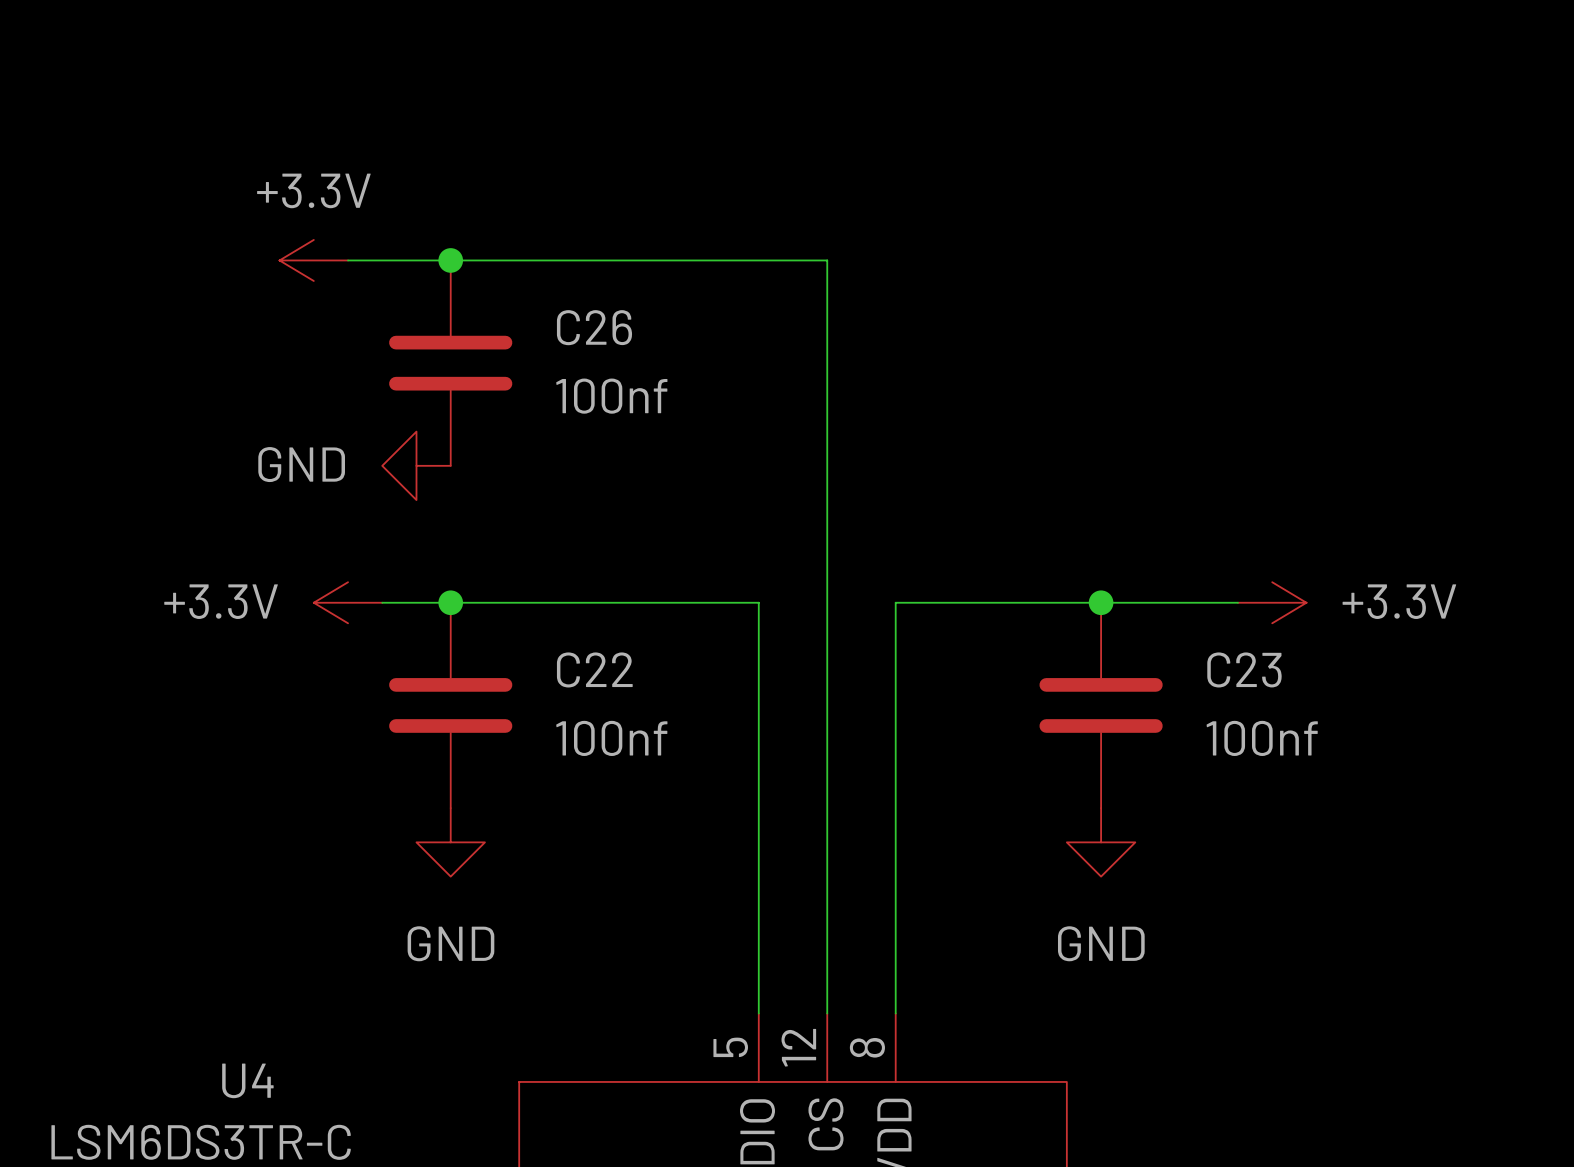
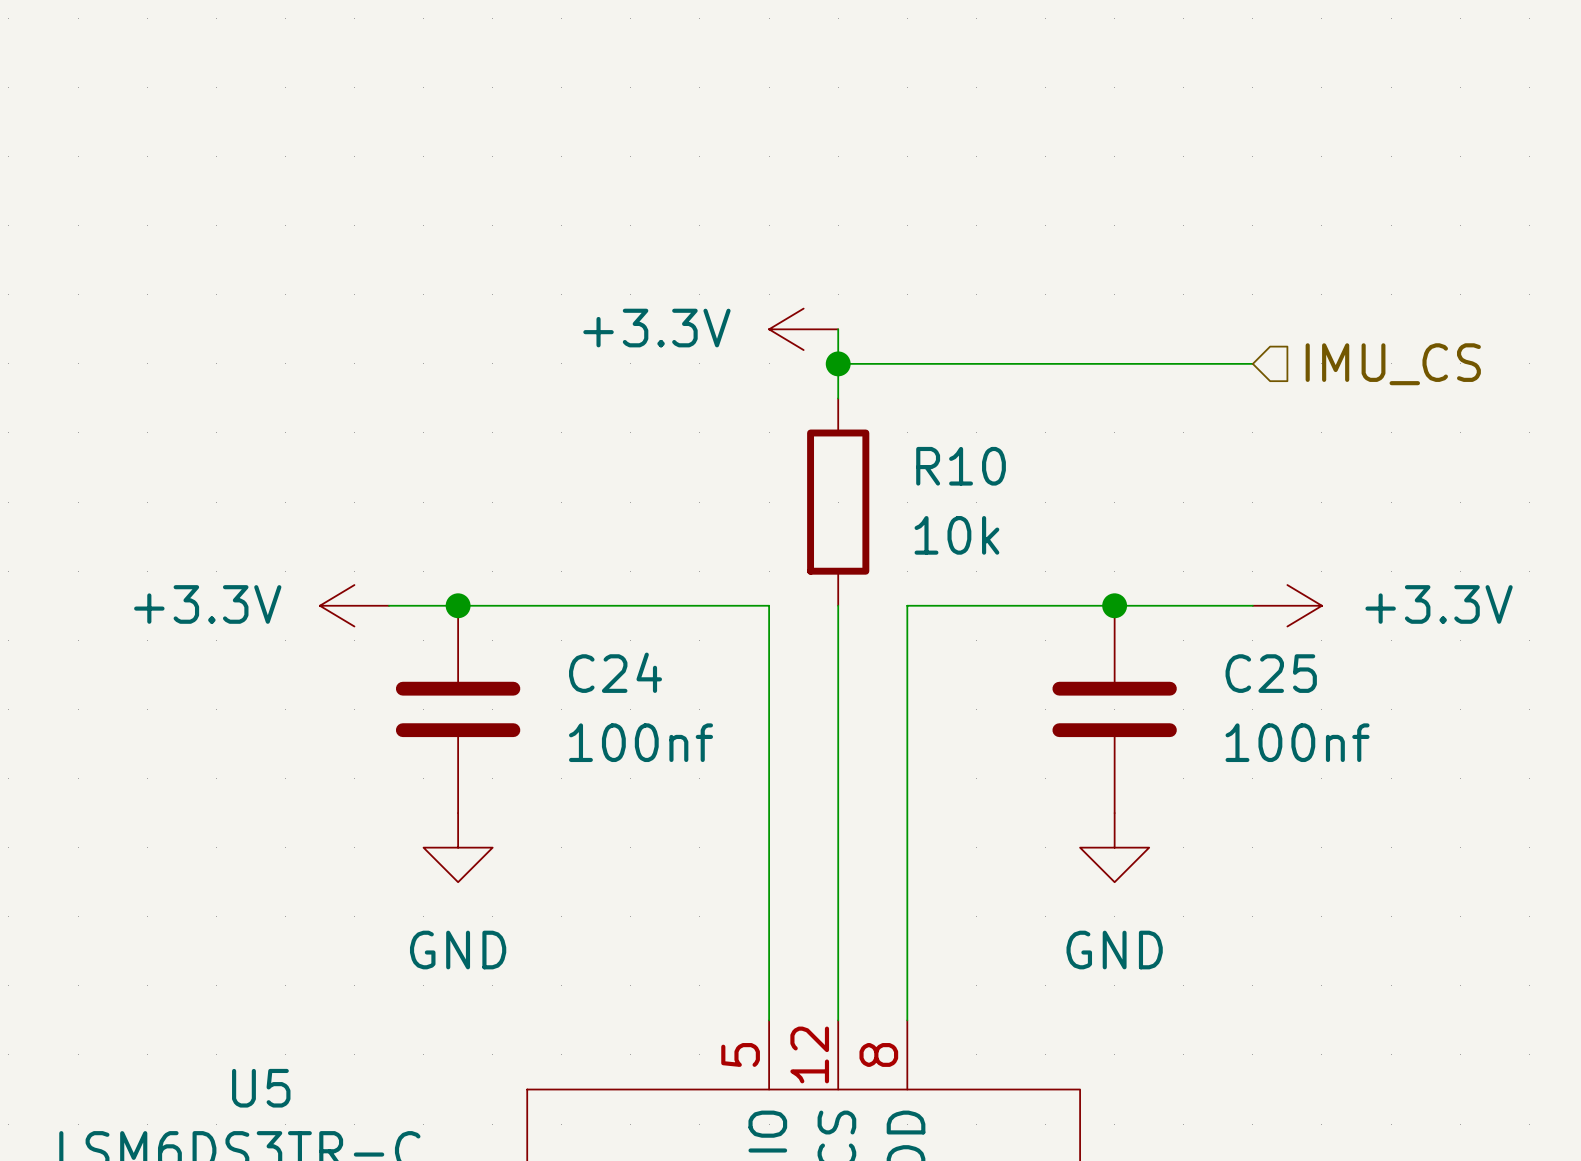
power symbol text position: +3.3V (313, 190) -> +3.3V (656, 328)
power symbol position: +3.3V (313, 260) -> +3.3V (803, 329)
wire: (348, 260) (827, 260) (827, 328) -> none
junction: (450, 260) -> none
hierarchical label: none -> IMU_CS (1393, 364)
C26: 100nf (450, 363) -> none
wire: none -> (838, 363) (1252, 363)
junction: none -> (838, 363)
wire: (827, 397) (827, 602) -> none
power symbol: GND (416, 465) -> none
R10: none -> 10k (838, 502)
C22 name: C22 (594, 669) -> C24 (615, 672)
C23 name: C23 (1244, 669) -> C25 (1271, 673)
U4 name: U4 (247, 1080) -> U5 (261, 1088)

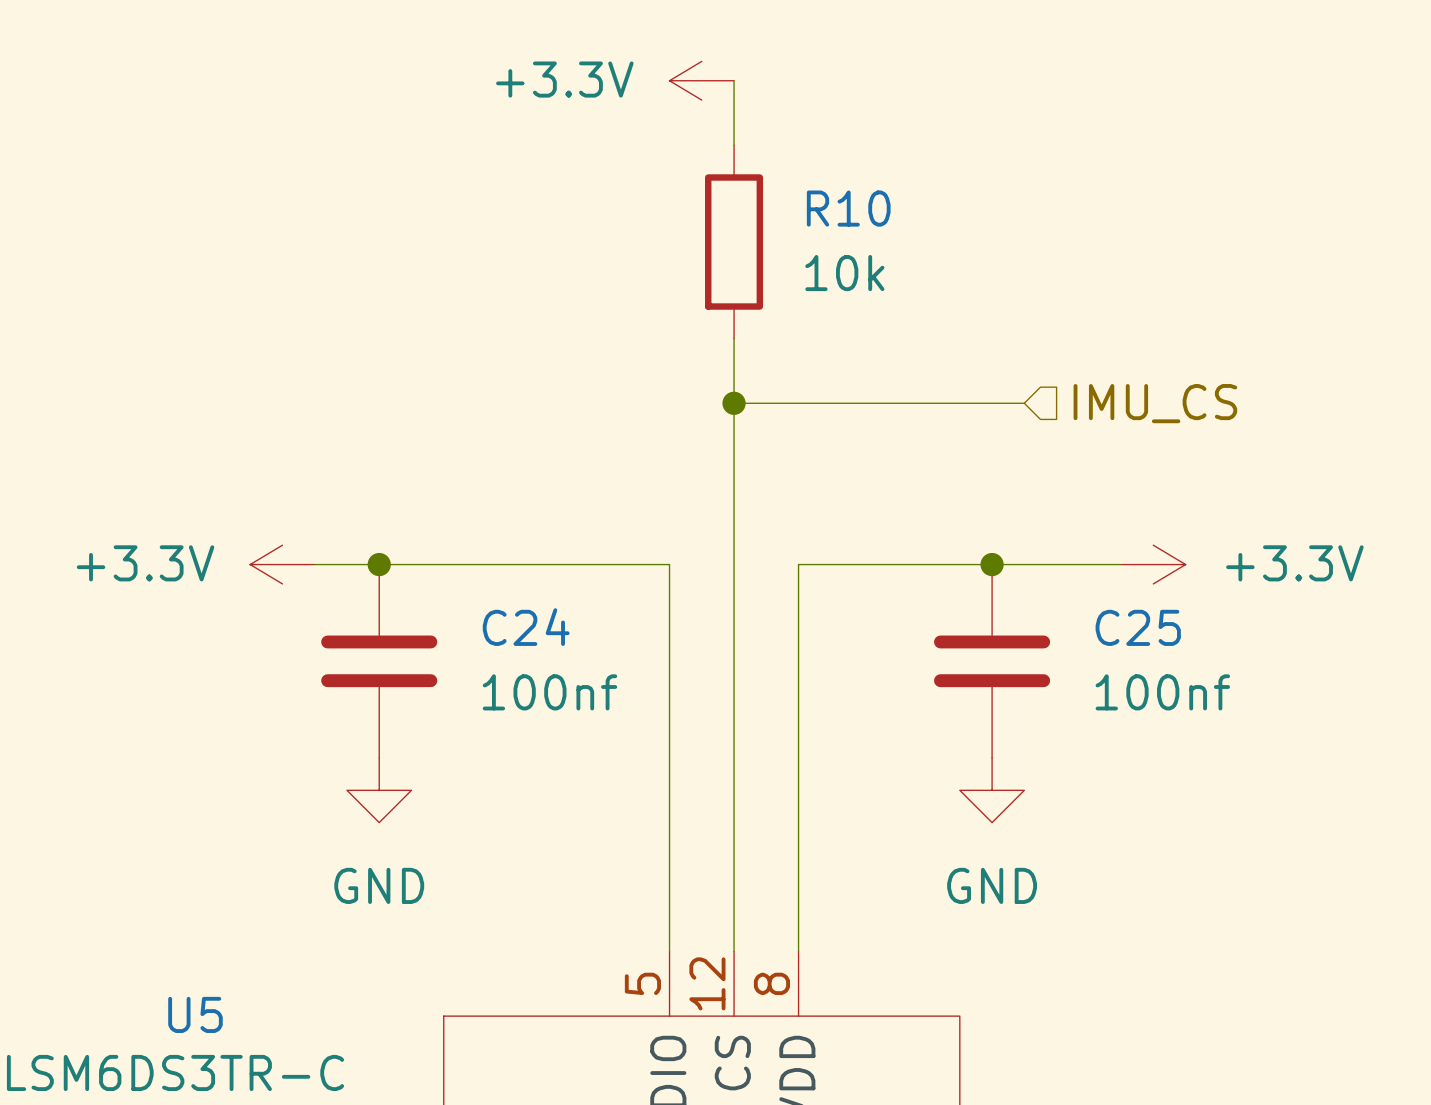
wire: none -> (734, 80) (734, 145)
power symbol position: +3.3V (803, 329) -> +3.3V (701, 80)
wire: (838, 329) (838, 363) (1252, 363) -> none
junction position: (838, 363) -> (734, 403)
hierarchical label position: IMU_CS (1393, 364) -> IMU_CS (1155, 403)
wire: none -> (734, 371) (734, 564)
wire: none -> (734, 403) (1024, 403)
R10 position: (838, 502) -> (734, 242)

